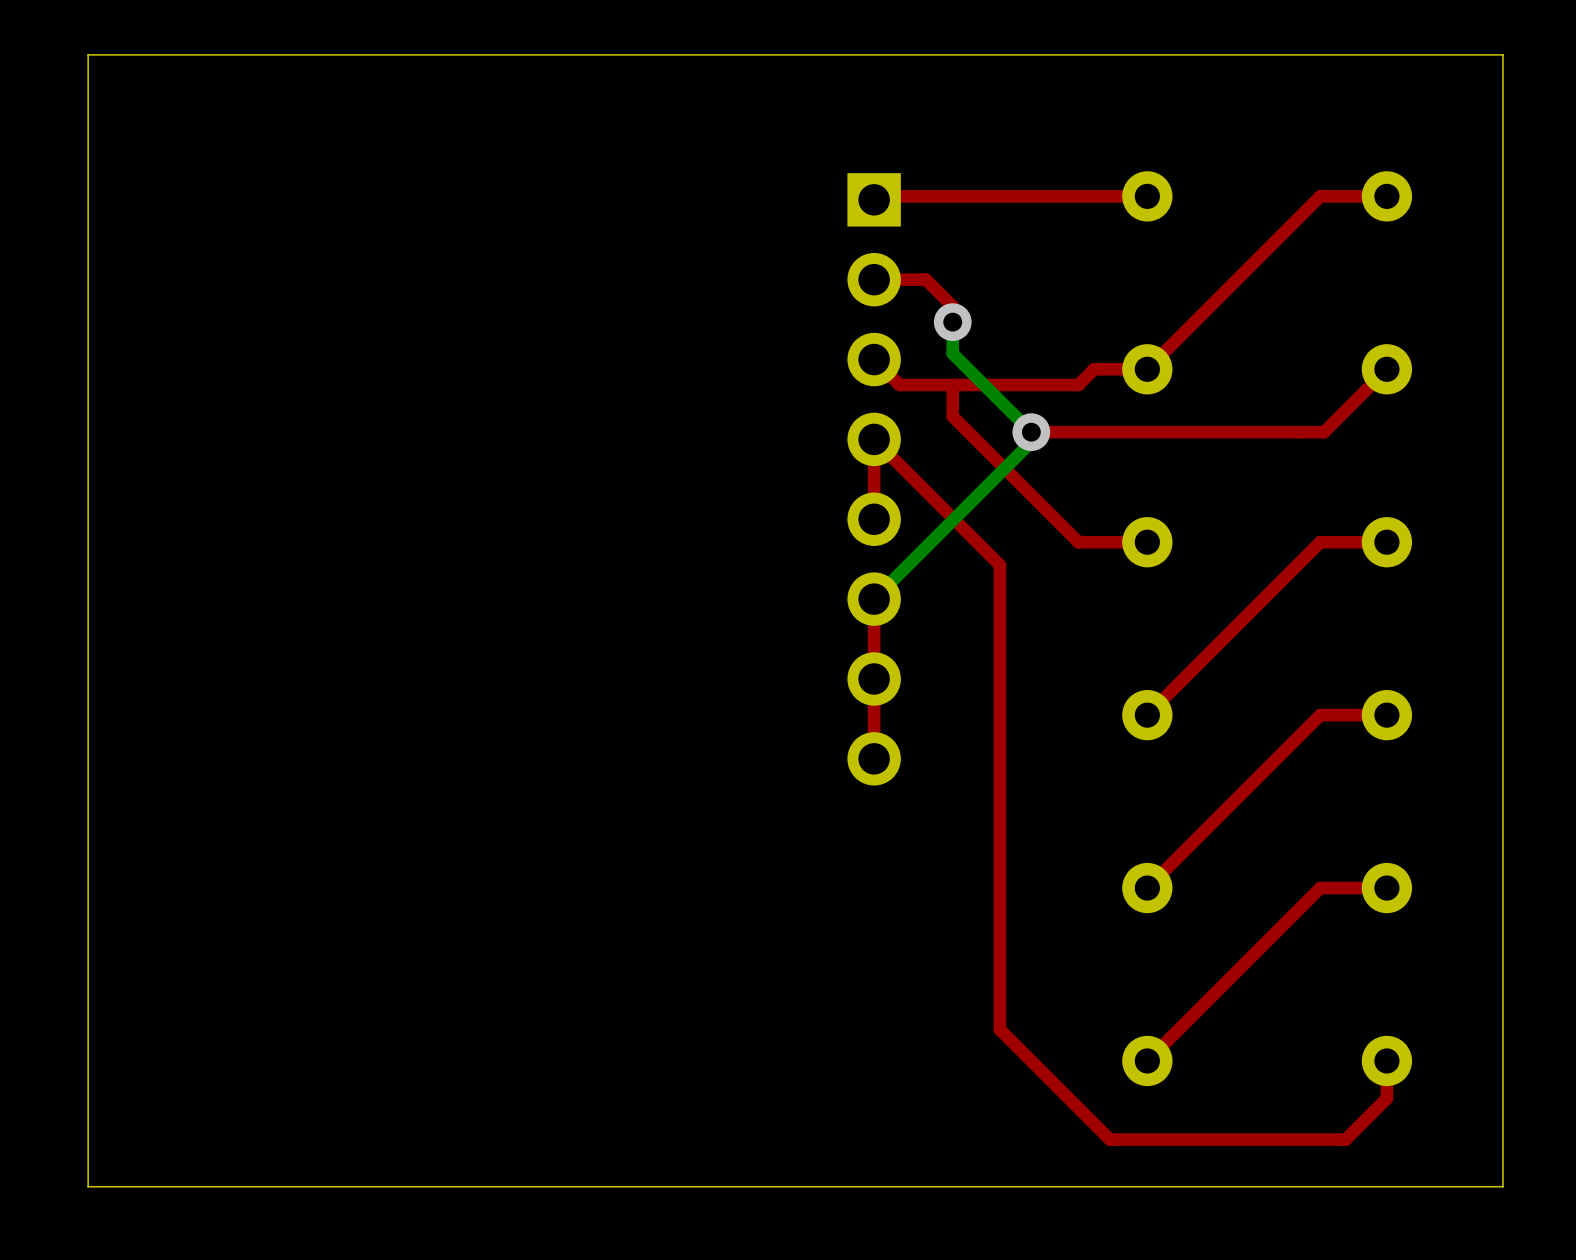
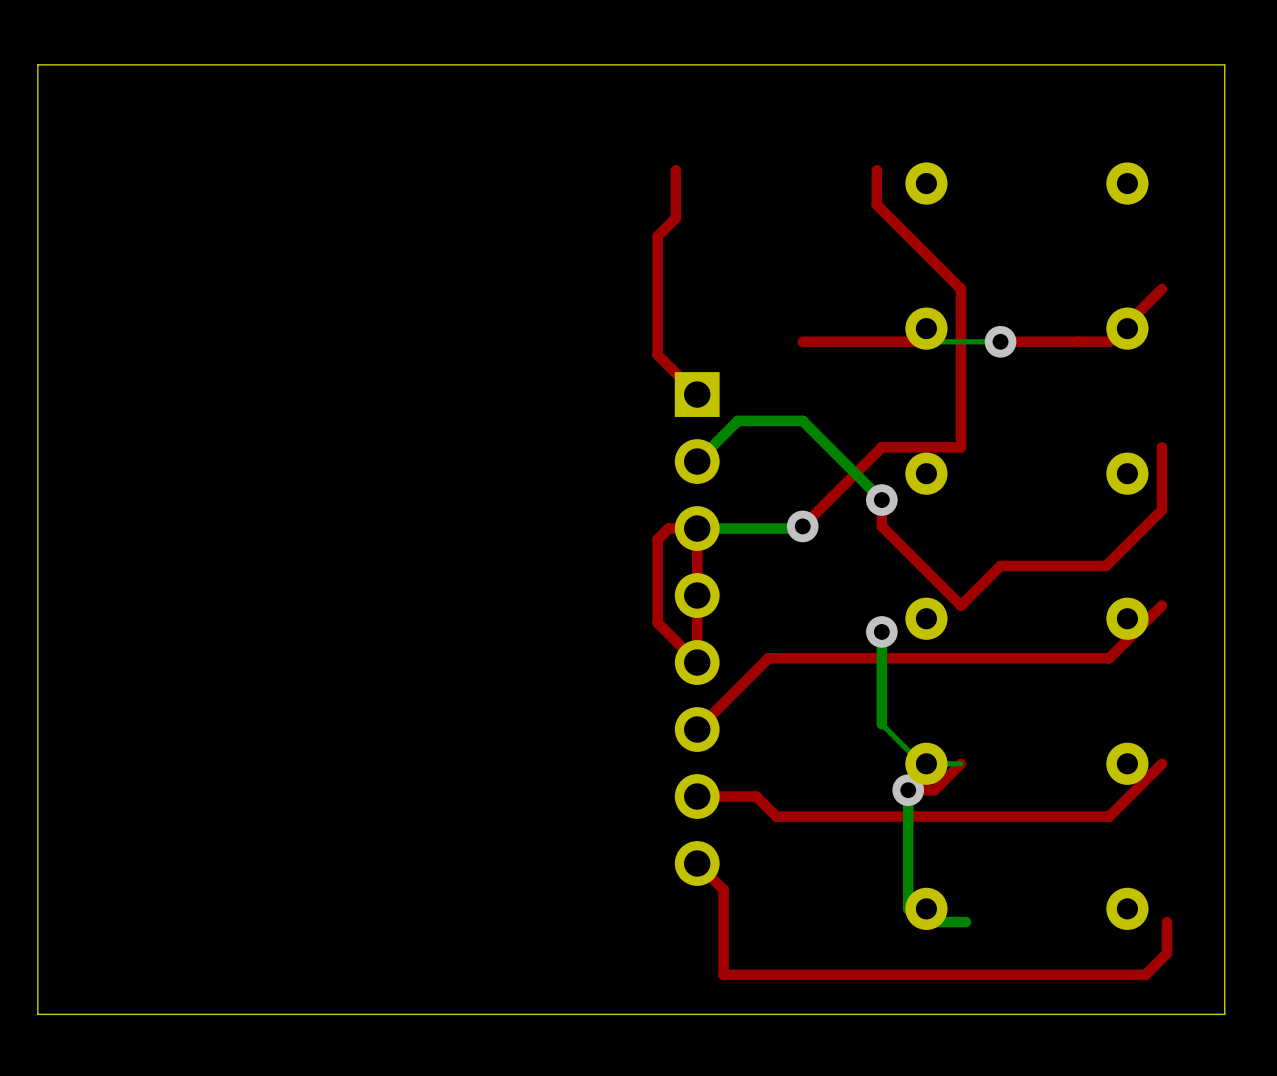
top track: none -> (675, 170) (675, 218) (657, 236) (657, 354) (697, 394)
top track: none -> (876, 170) (876, 204) (960, 289) (960, 447) (881, 447) (802, 526)
top track: (1147, 196) (877, 196) (874, 199) -> none
top track: (1386, 196) (1320, 196) (1147, 369) (1094, 369) (1078, 385) -> (921, 341) (868, 341)
top track: (874, 279) (926, 279) (952, 306) (952, 322) -> none
bottom track: (952, 322) (952, 353) (1031, 432) (1031, 441) (874, 599) -> none
via: (952, 322) -> none
top track: none -> (1161, 289) (1109, 341) (1000, 341)
top track: (874, 359) (899, 385) (999, 385) -> none
top track: (1386, 369) (1324, 432) (1031, 432) -> none
top track: (952, 385) (952, 416) (1078, 542) (1147, 542) -> none
bottom track: none -> (1000, 341) (921, 341)
via: none -> (1000, 341)
via: (1031, 432) -> none
part position: (874, 479) -> (697, 629)
top track: none -> (1161, 447) (1161, 510) (1106, 565) (1000, 565) (960, 605) (881, 526) (881, 500)
top track: (874, 519) (874, 439) (999, 565) (999, 1029) (1109, 1139) -> (697, 863) (723, 889) (723, 974) (895, 974)
bottom track: none -> (697, 461) (737, 420) (802, 420) (881, 500)
top track: (1386, 542) (1320, 542) (1147, 715) -> none
via: none -> (881, 500)
bottom track: none -> (802, 526) (800, 528) (697, 528)
via: none -> (802, 526)
top track: none -> (697, 528) (668, 528) (657, 539) (657, 622) (697, 662)
top track: none -> (1161, 605) (1109, 658) (768, 658) (697, 729)
top track: (1386, 715) (1320, 715) (1147, 888) -> none
bottom track: none -> (881, 631) (881, 724) (921, 763) (960, 763)
via: none -> (881, 631)
top track: none -> (960, 763) (934, 790) (908, 790)
top track: (1386, 888) (1320, 888) (1147, 1060) -> none
top track: none -> (1161, 763) (1109, 816) (776, 816) (756, 796) (697, 796)
bottom track: none -> (908, 790) (908, 908) (921, 922) (965, 922)
via: none -> (908, 790)
top track: (1386, 1060) (1386, 1098) (1345, 1139) -> (1166, 922) (1166, 953) (1145, 974) (1092, 974)

